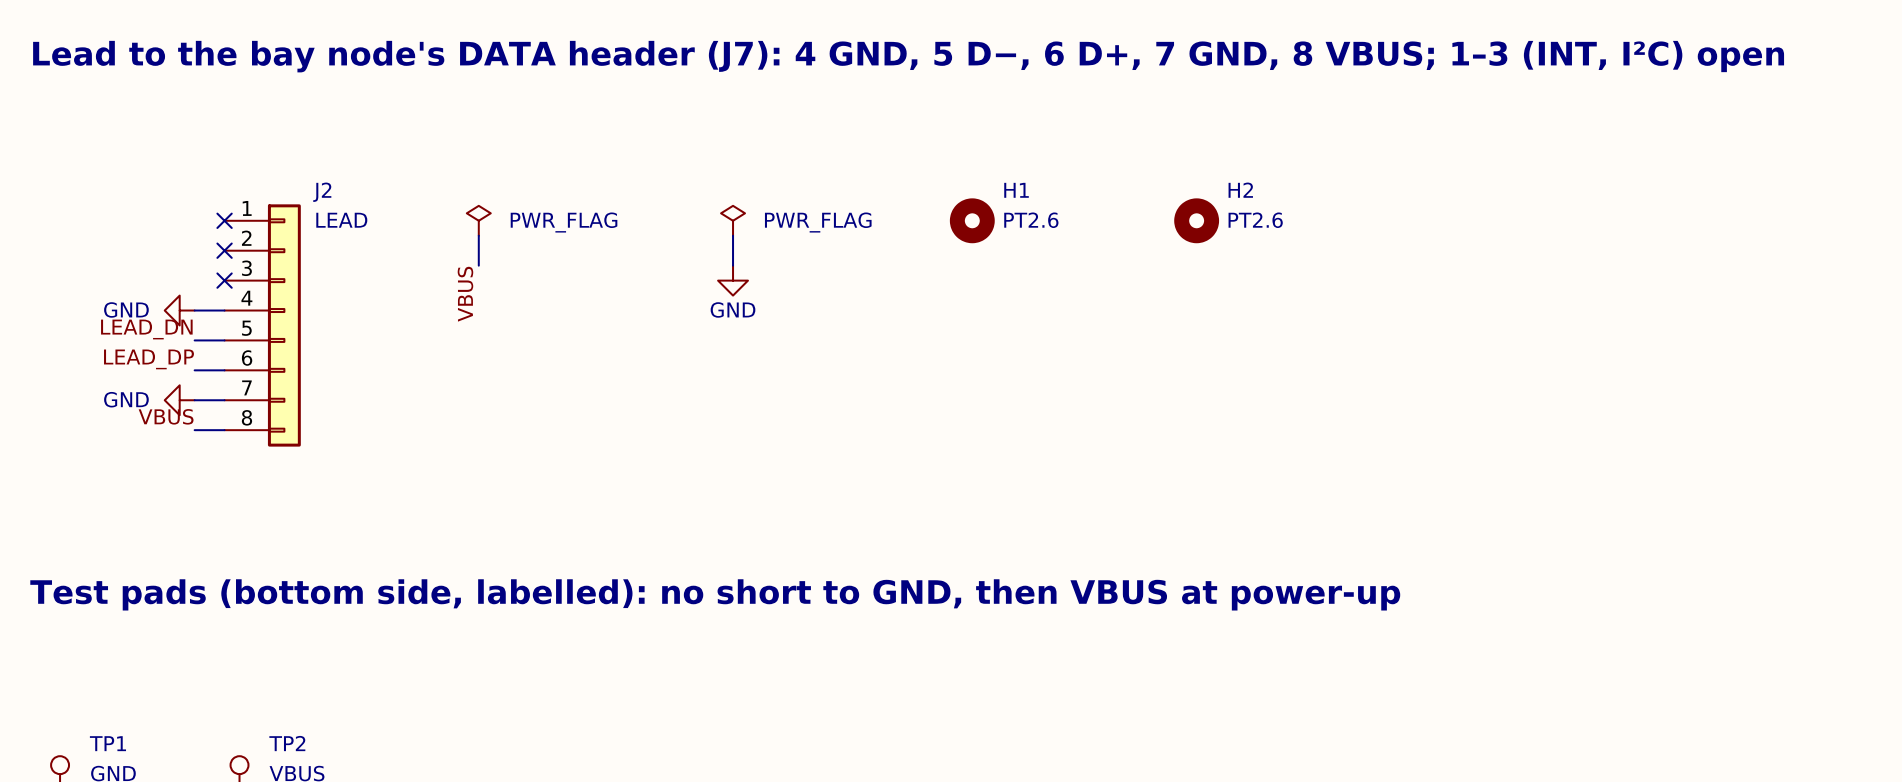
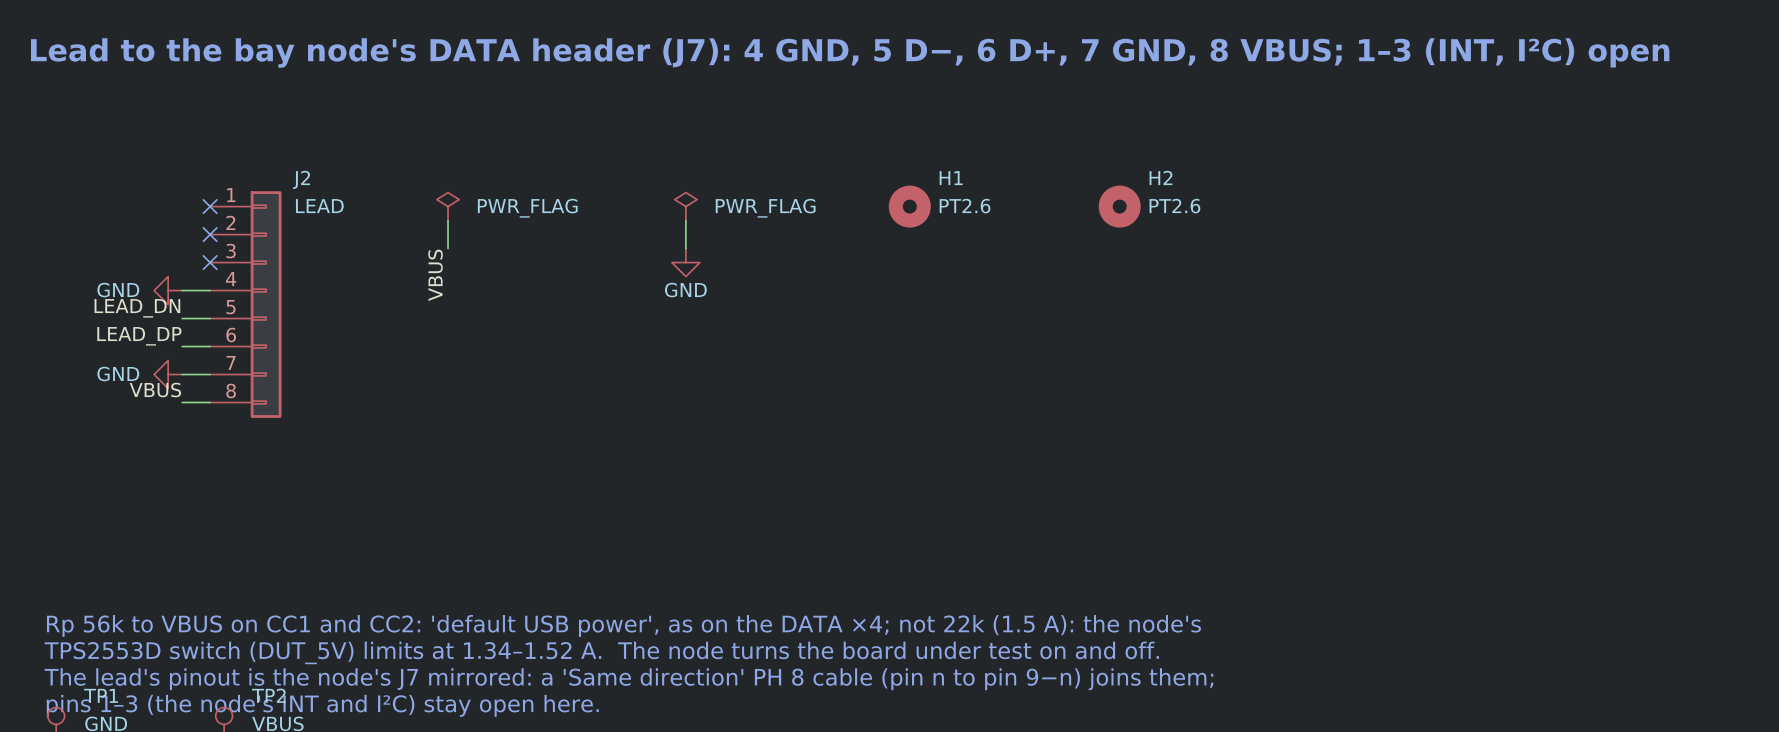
text: Test pads (bottom side, labelled): no short to GND, then VBUS at power-up (715, 594) -> none
text: none -> Rp 56k to VBUS on CC1 and CC2: 'default USB power', as on the DATA ×4; not 22k (1.5 A): the node's (623, 626)
text: none -> TPS2553D switch (DUT_5V) limits at 1.34–1.52 A. The node turns the board under test on and off. (601, 652)
text: none -> The lead's pinout is the node's J7 mirrored: a 'Same direction' PH 8 cable (pin n to pin 9−n) joins them; (628, 679)
text: none -> pins 1–3 (the node's INT and I²C) stay open here. (322, 705)

